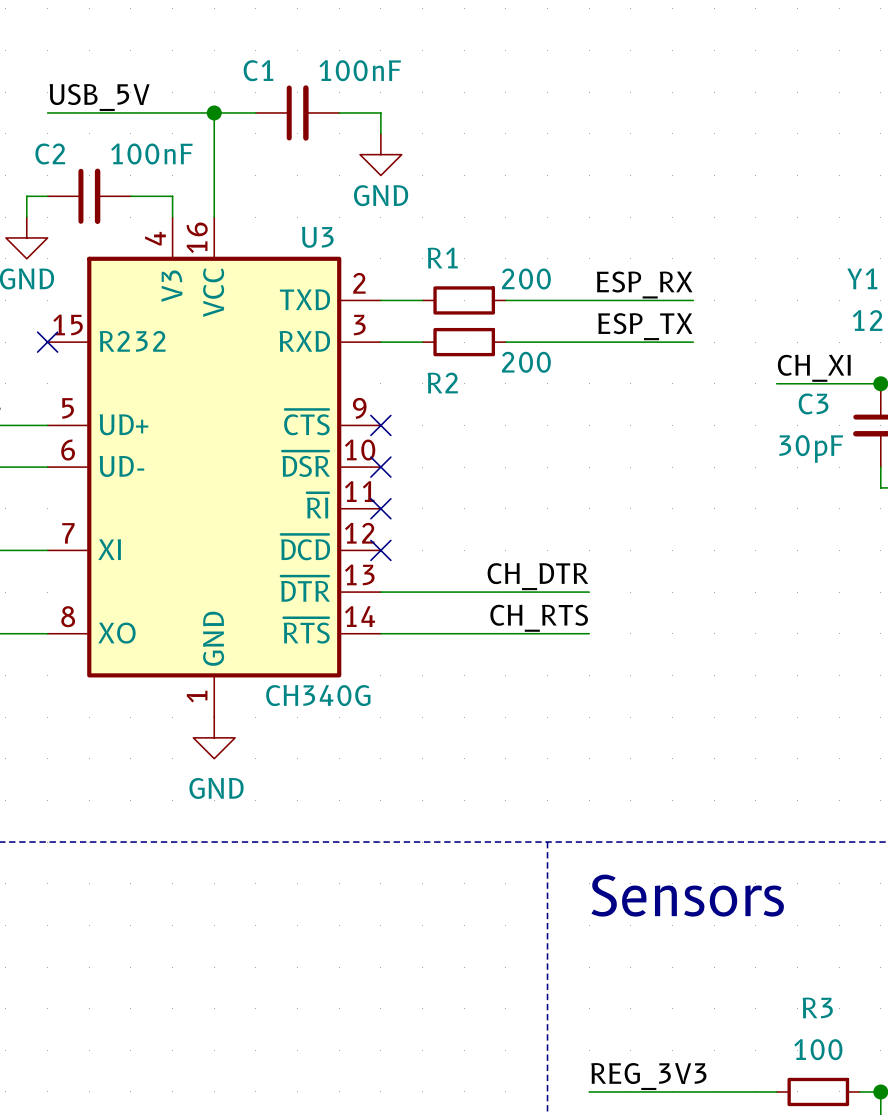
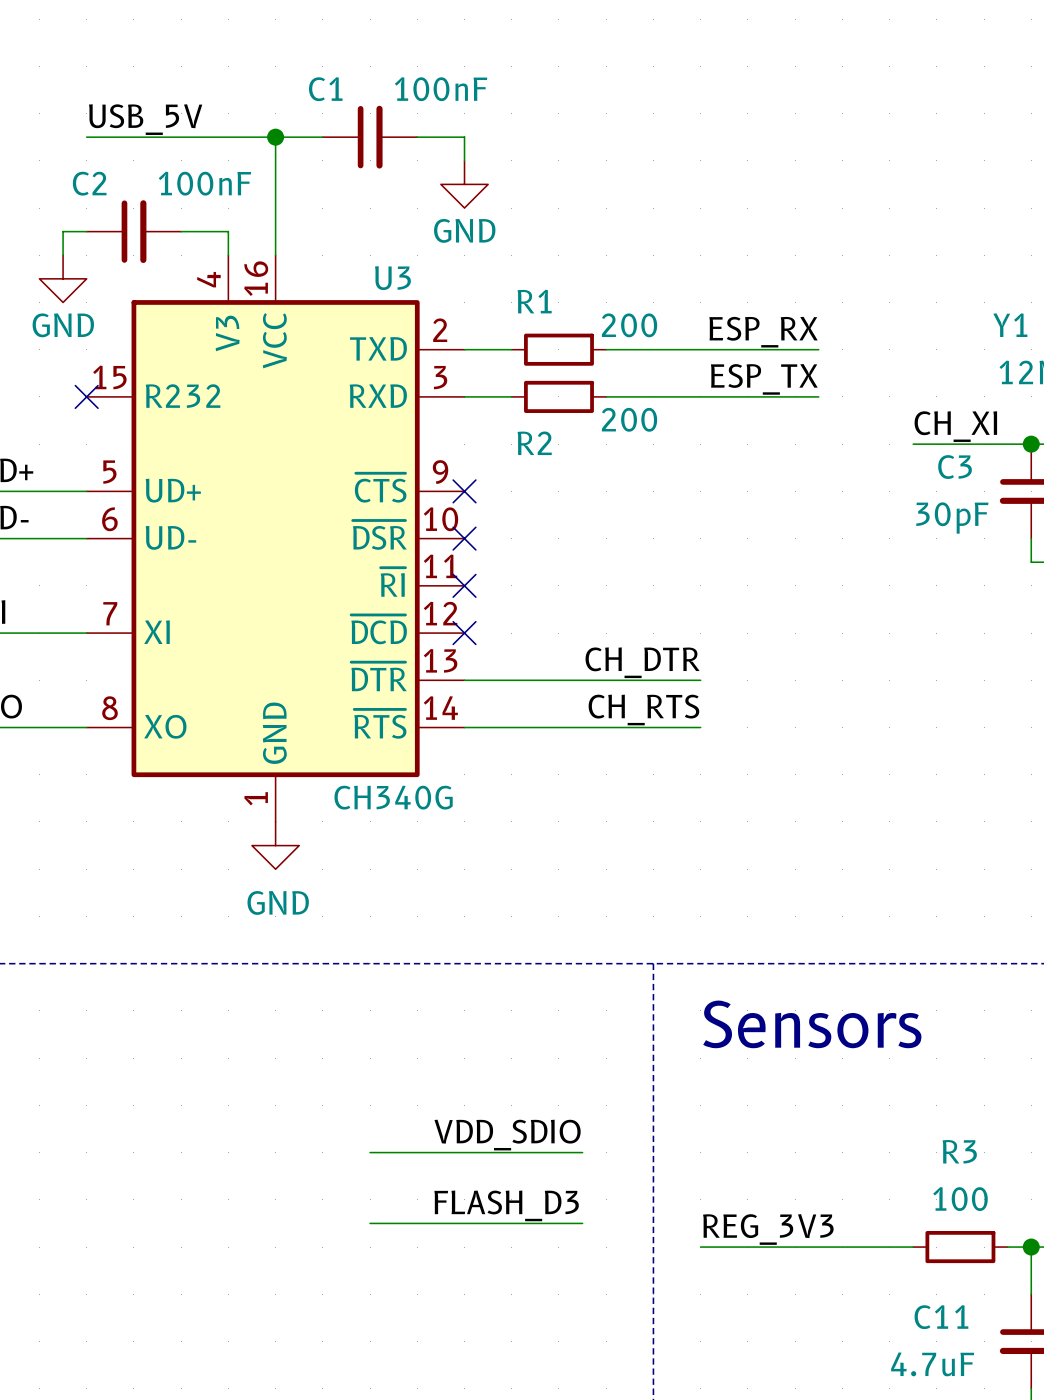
label: none -> VDD_SDIO (507, 1135)
wire: none -> (370, 1152) (582, 1152)
label: none -> FLASH_D3 (506, 1205)
wire: none -> (370, 1223) (582, 1223)

